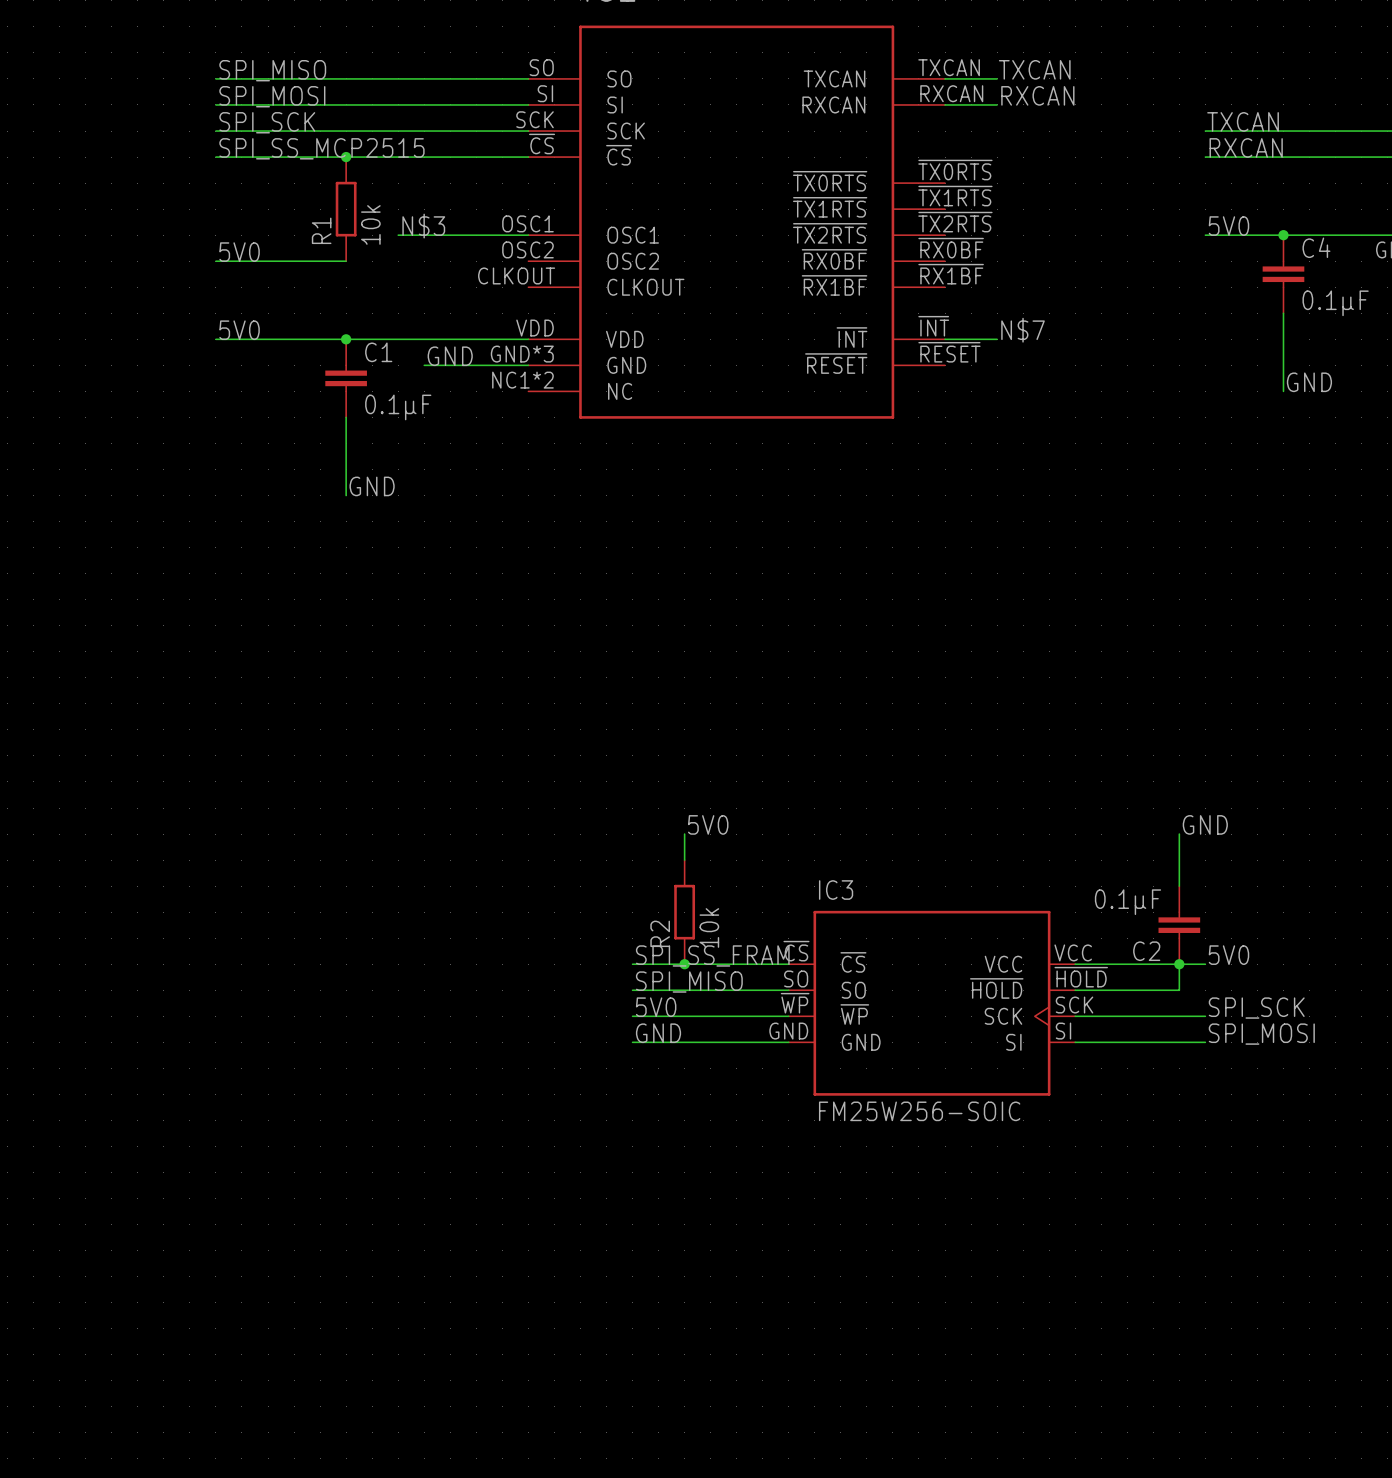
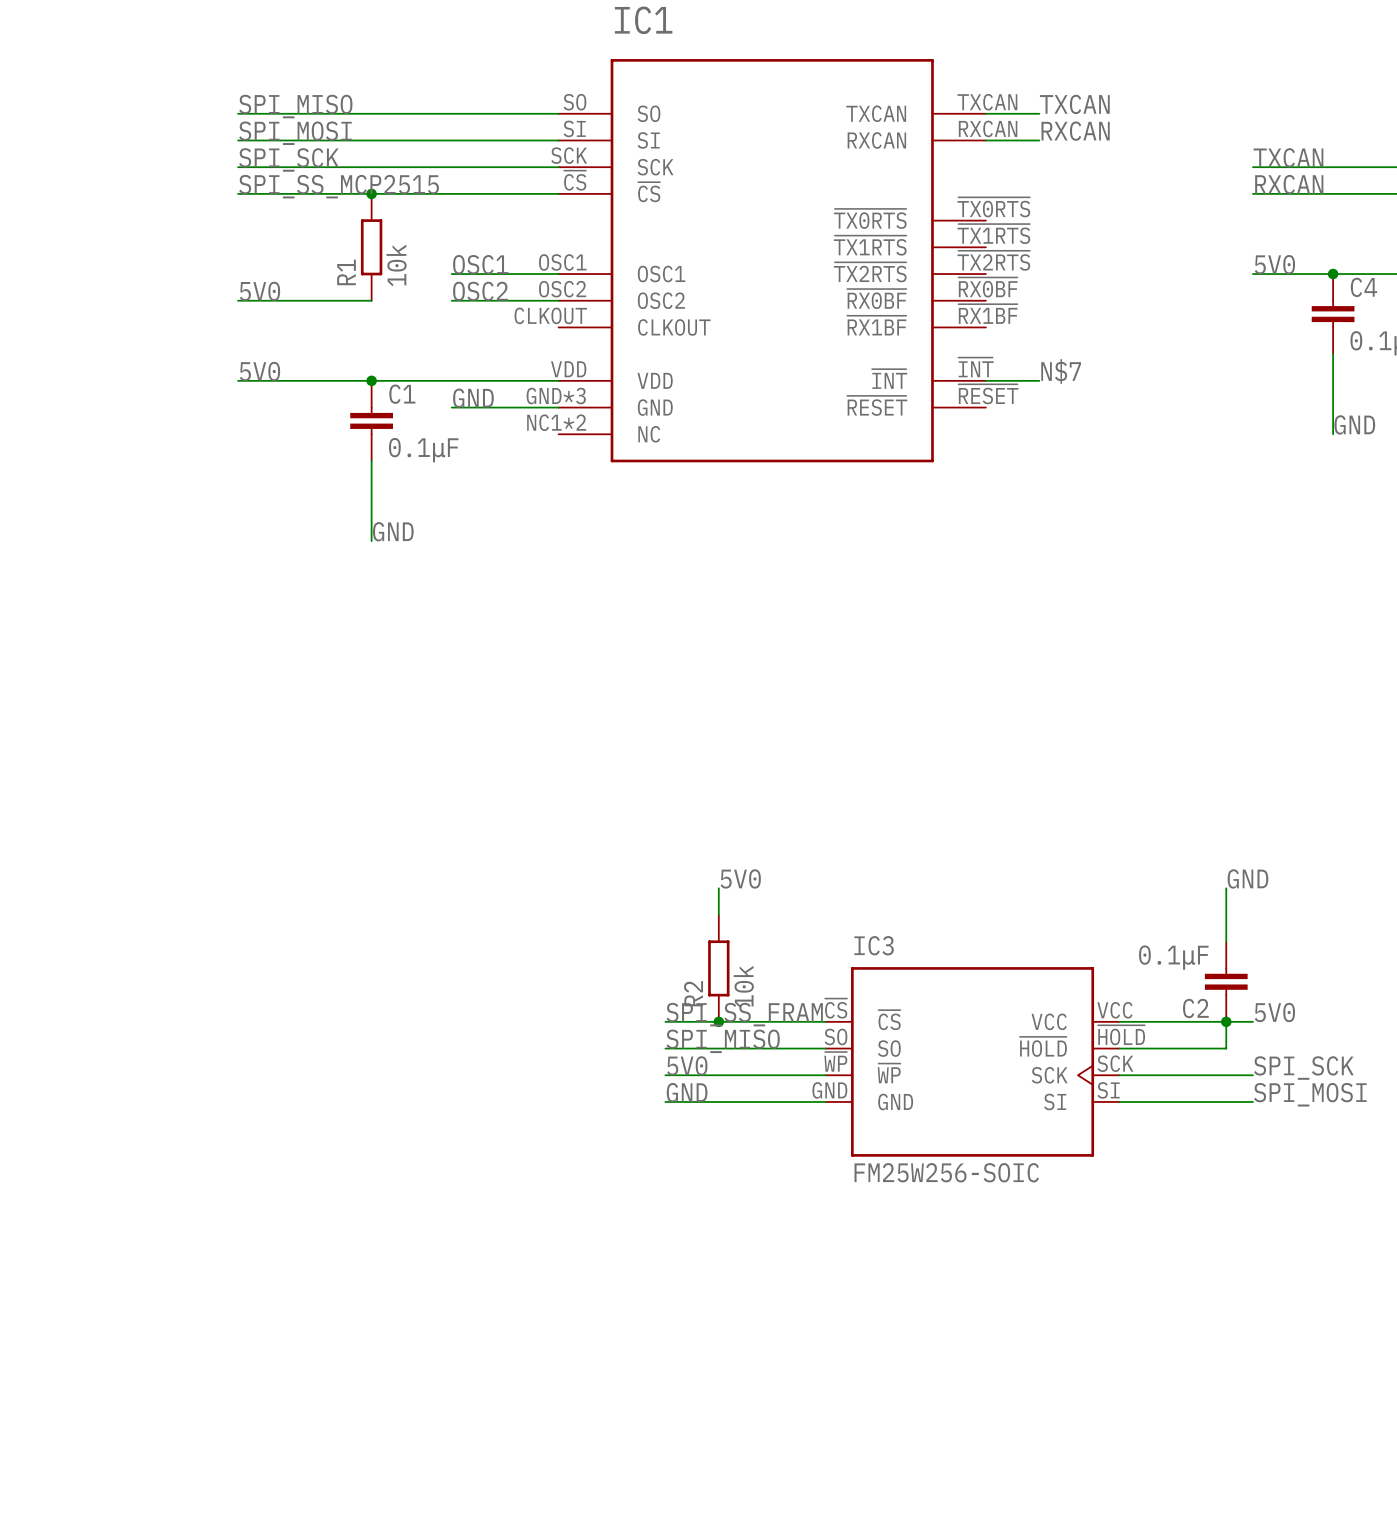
label: N$3 (423, 226) -> none
label: none -> OSC1 (480, 264)
wire: (398, 235) (424, 235) -> none
label: none -> OSC2 (480, 291)
wire: none -> (451, 300) (558, 300)

